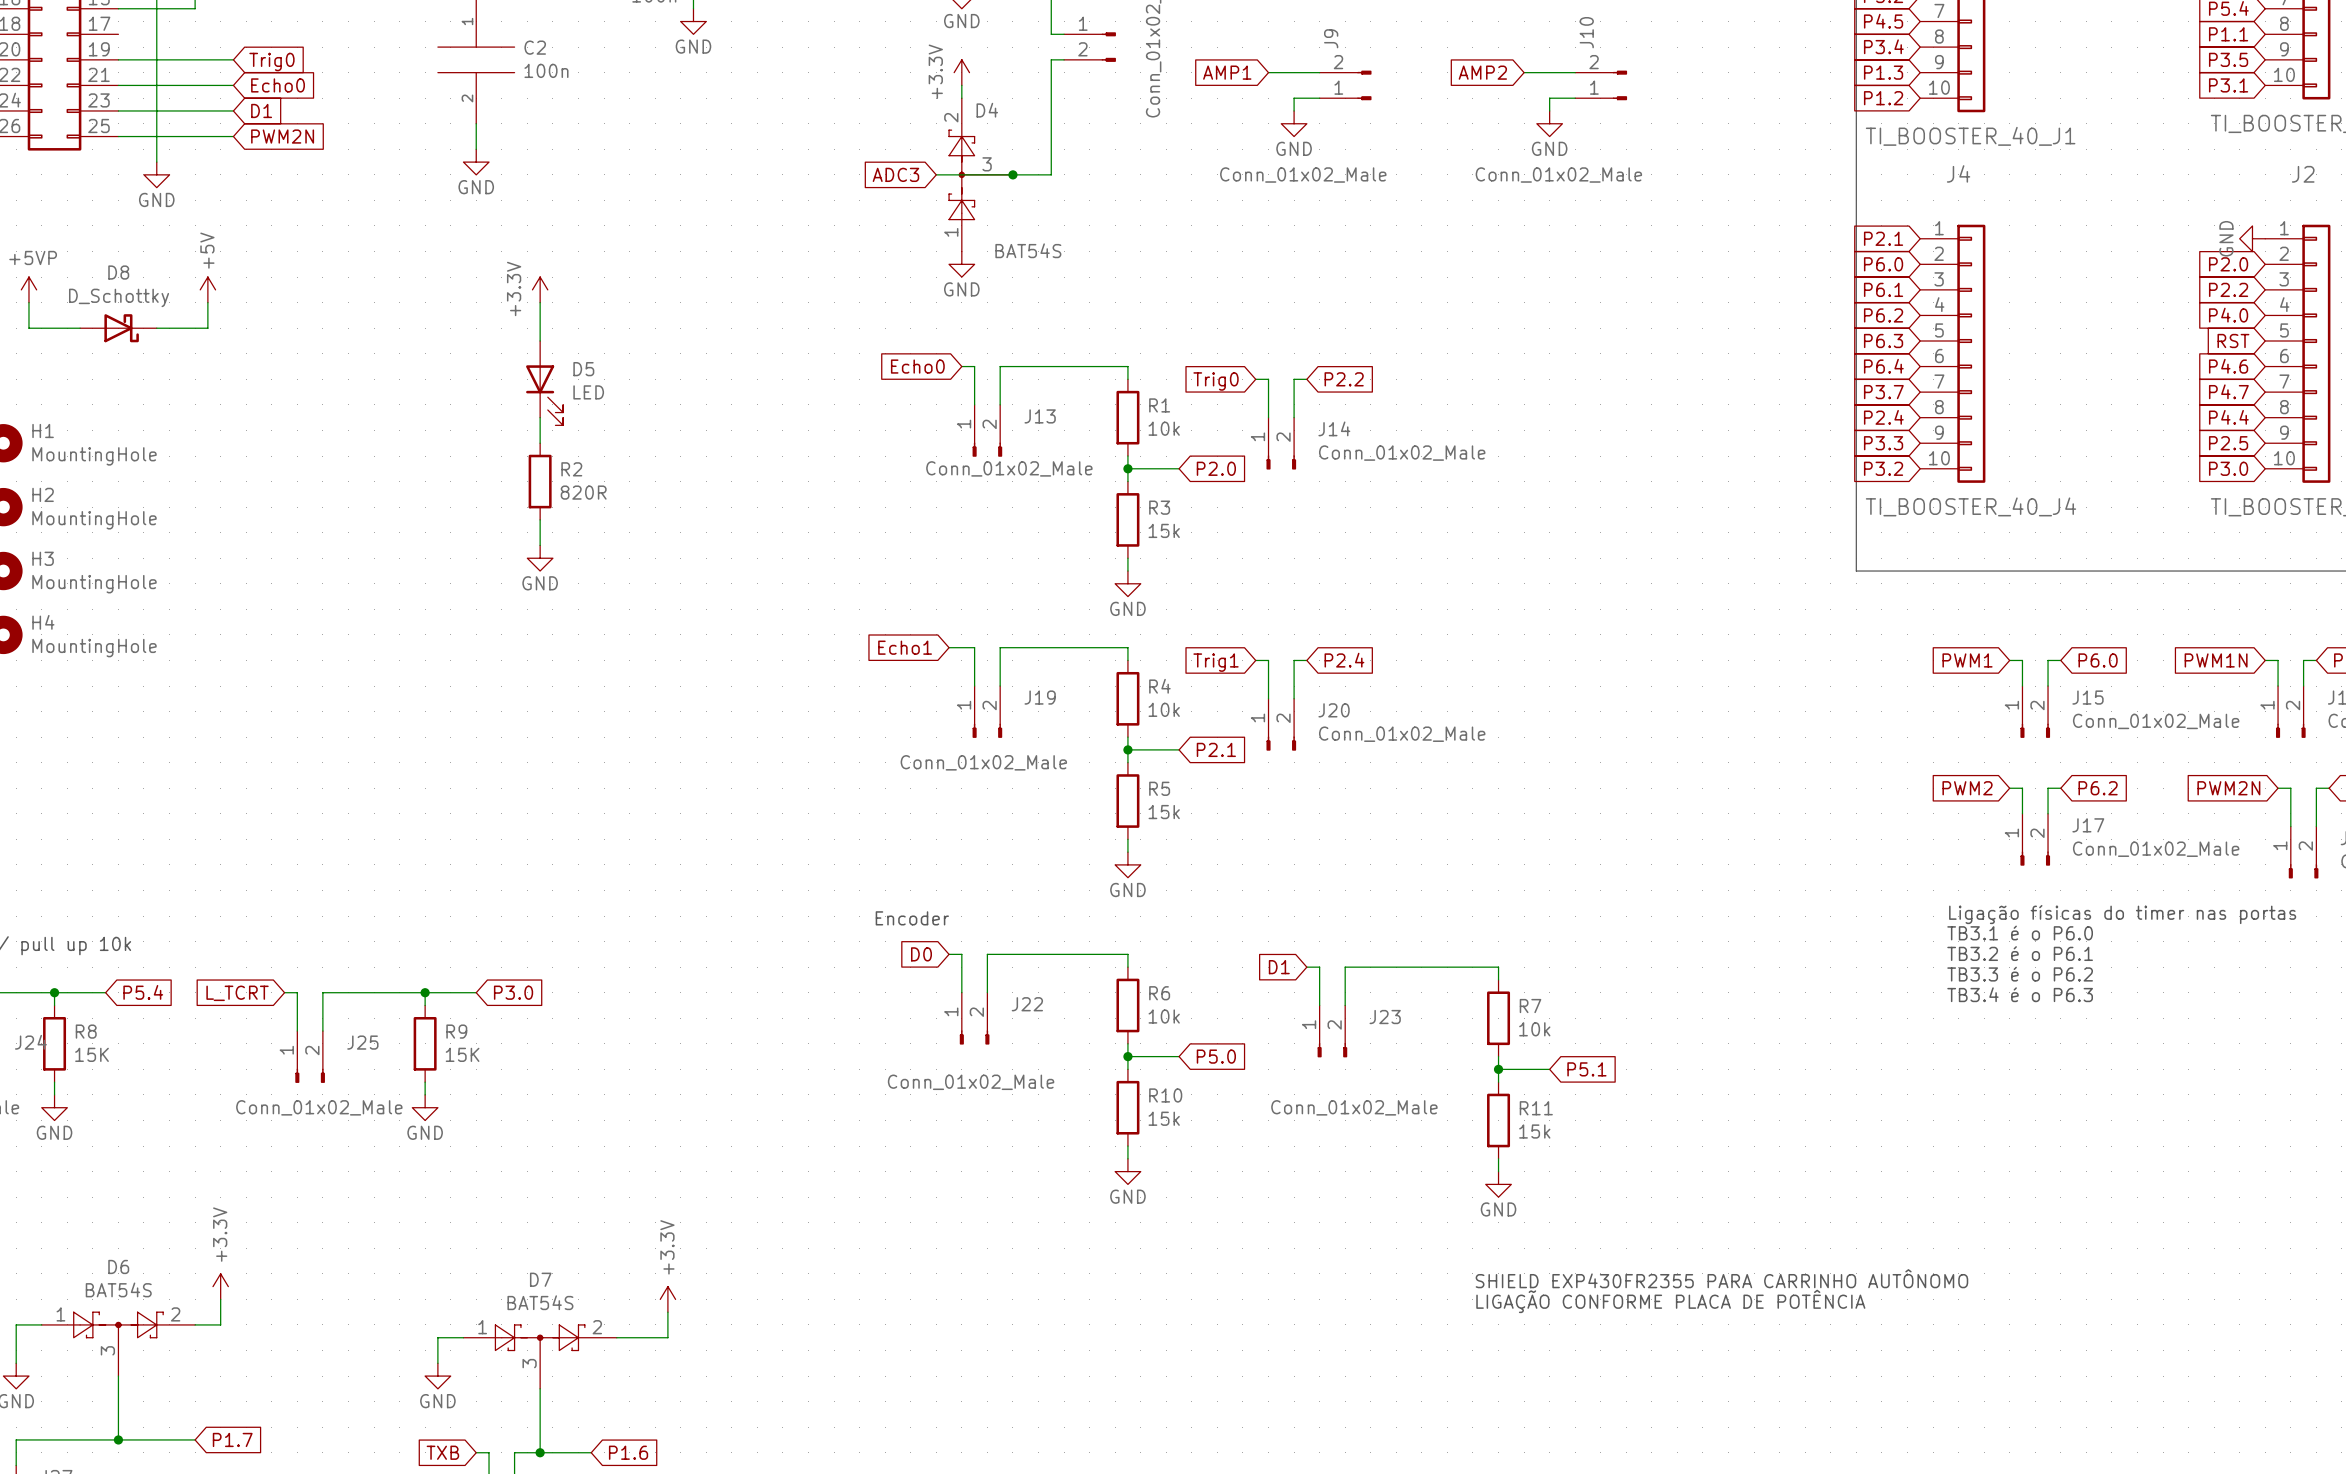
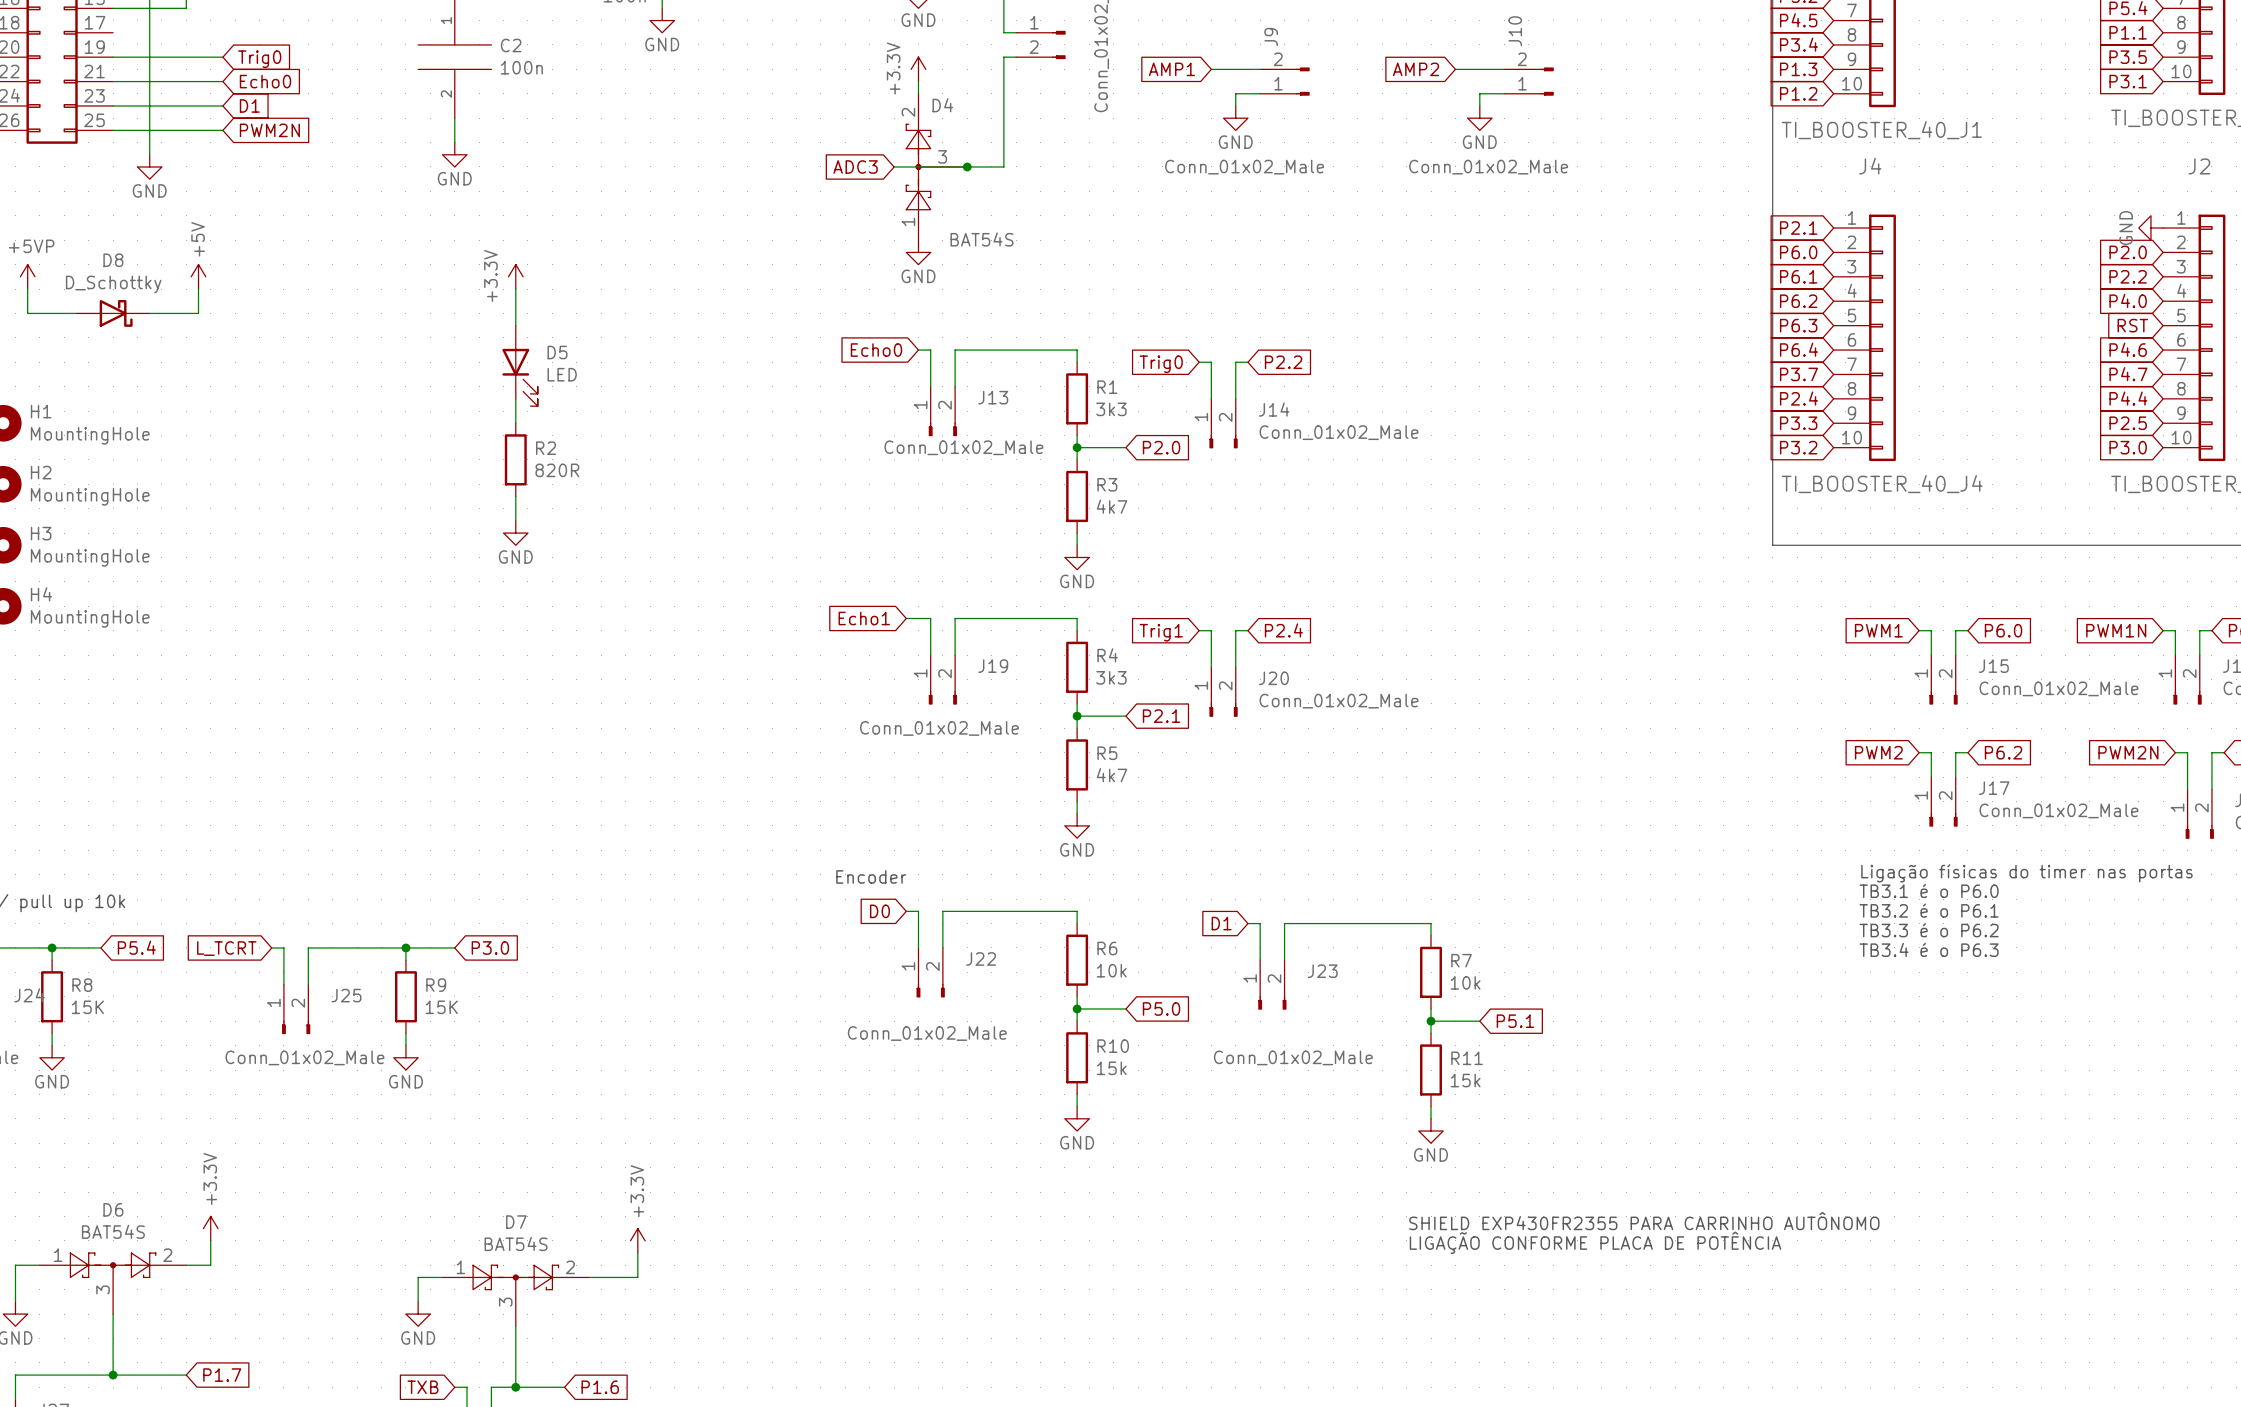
R1 value: 10k (1164, 428) -> 3k3 (1111, 409)
R3 value: 15k (1164, 530) -> 4k7 (1112, 506)
R4 value: 10k (1164, 709) -> 3k3 (1111, 677)
R5 value: 15k (1164, 812) -> 4k7 (1112, 775)

